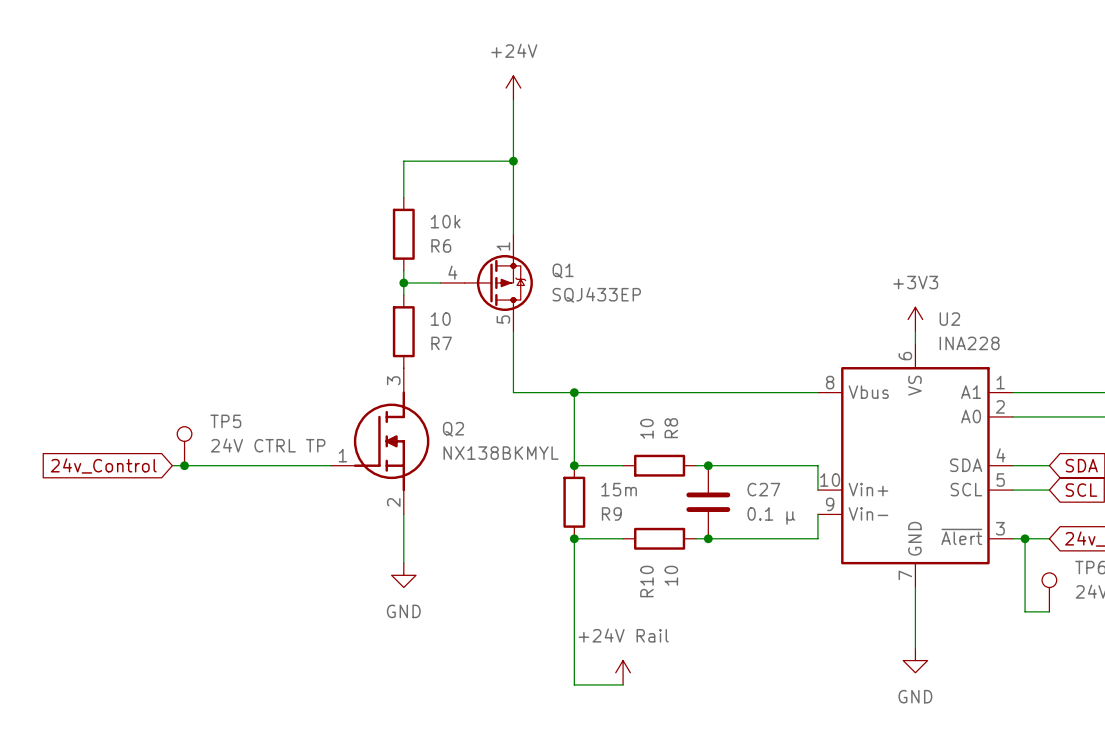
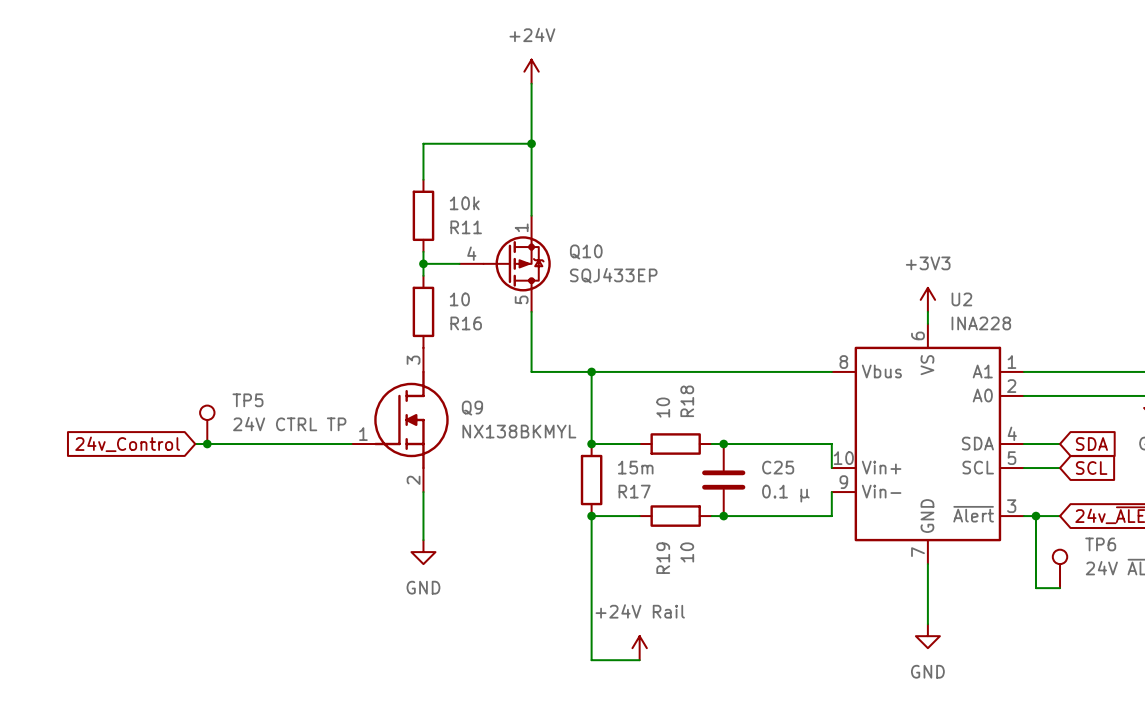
R6 name: R6 (441, 245) -> R11 (466, 227)
Q1 name: Q1 (563, 270) -> Q10 (586, 251)
R7 name: R7 (441, 343) -> R16 (466, 323)
R8 name: R8 (671, 428) -> R18 (687, 401)
Q2 name: Q2 (453, 429) -> Q9 (472, 408)
C27 name: C27 (763, 489) -> C25 (778, 467)
R9 name: R9 (611, 513) -> R17 (634, 491)
R10 name: R10 (646, 581) -> R19 (663, 558)

